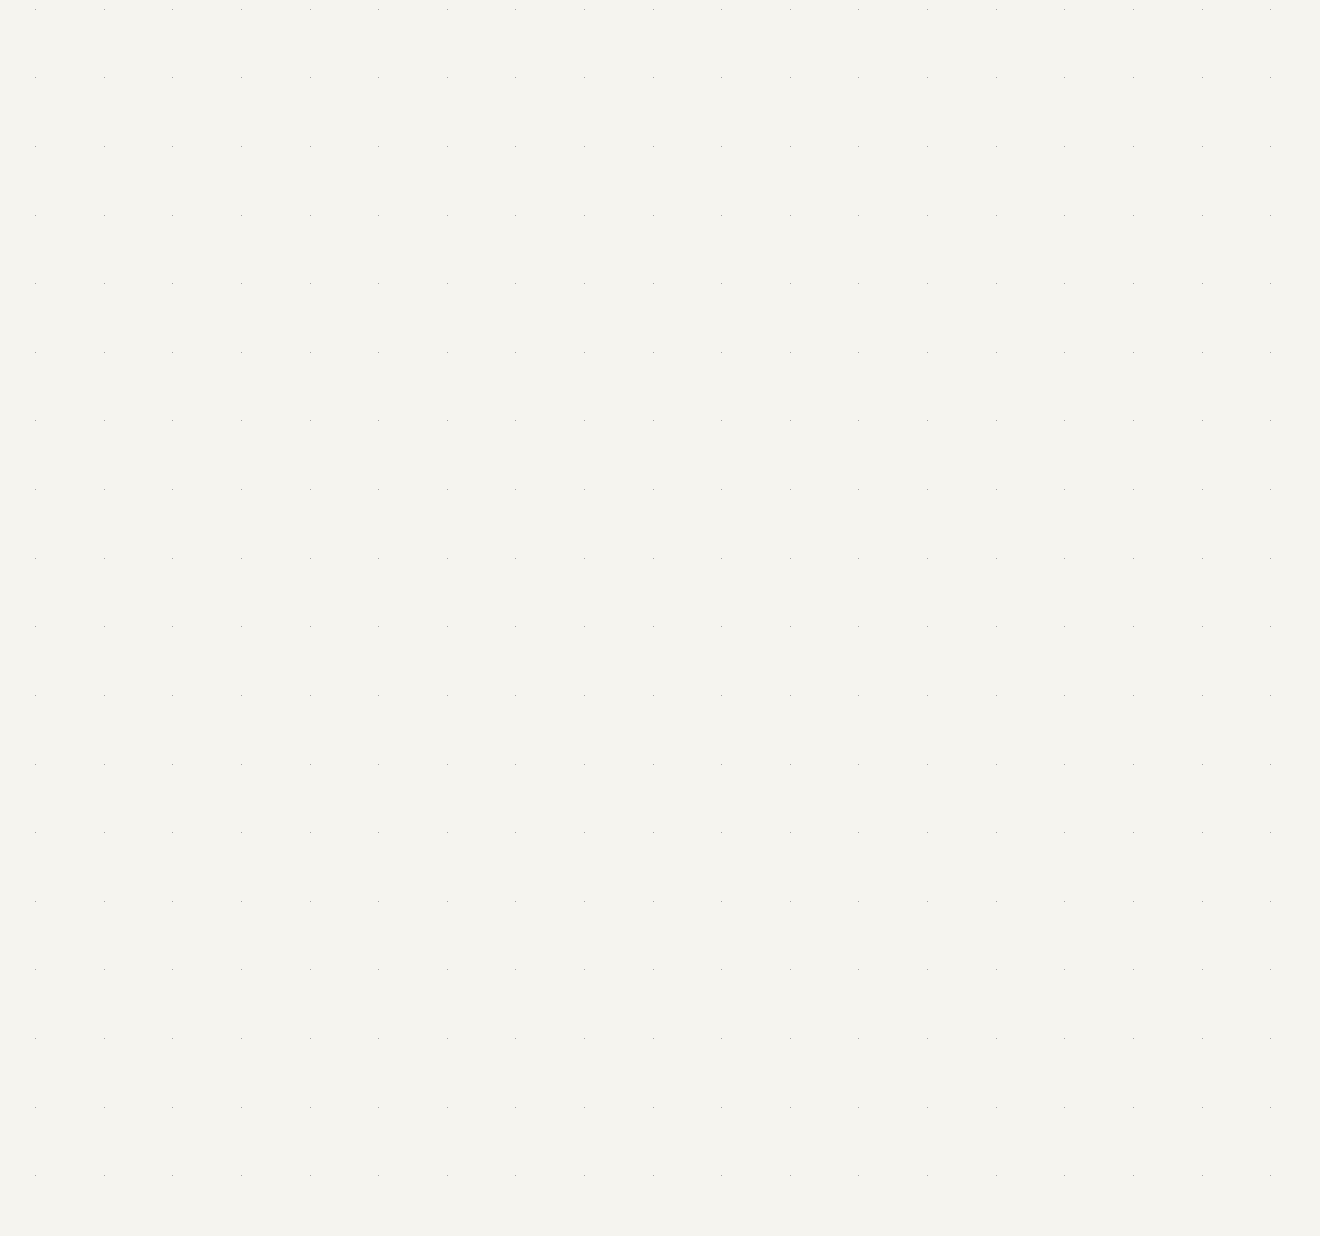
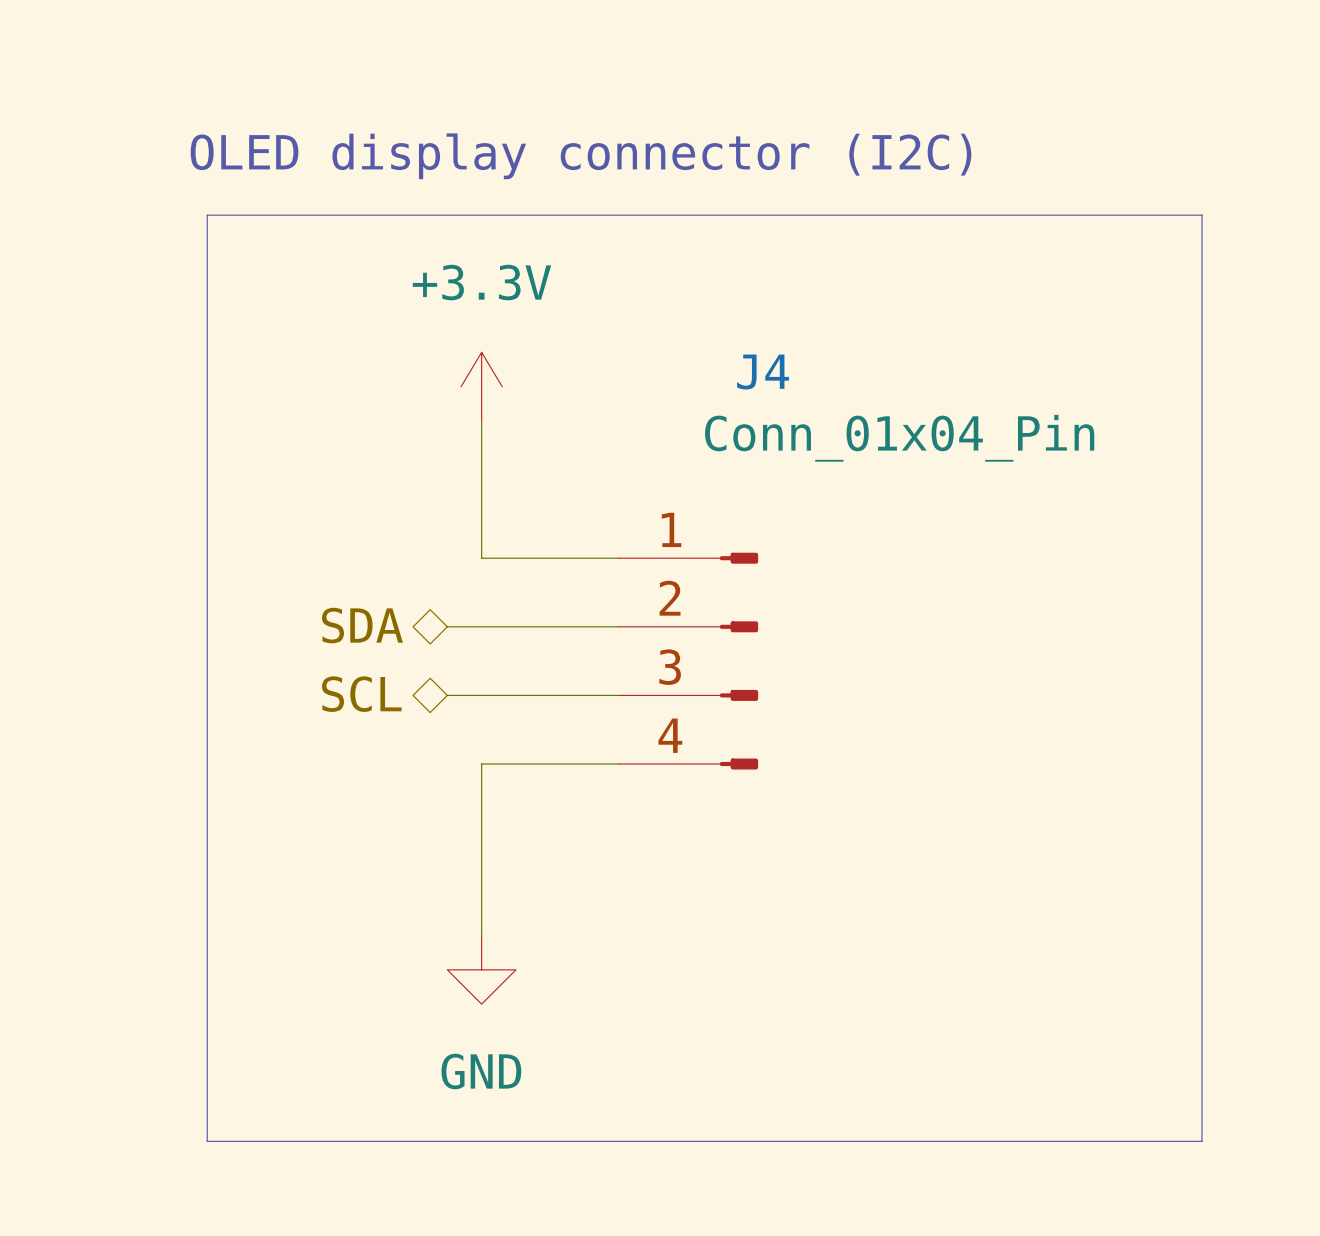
text: none -> OLED display connector (I2C) (581, 156)
line: none -> (207, 215) (1202, 215) (1202, 1141) (207, 1141) (207, 215)
power symbol: none -> +3.3V (481, 386)
wire: none -> (481, 420) (481, 558) (618, 558)
hierarchical label: none -> SDA (362, 625)
wire: none -> (447, 626) (618, 626)
J4: none -> Conn_01x04_Pin (688, 661)
hierarchical label: none -> SCL (361, 694)
wire: none -> (447, 695) (618, 695)
wire: none -> (618, 764) (481, 764) (481, 935)
power symbol: none -> GND (481, 969)

